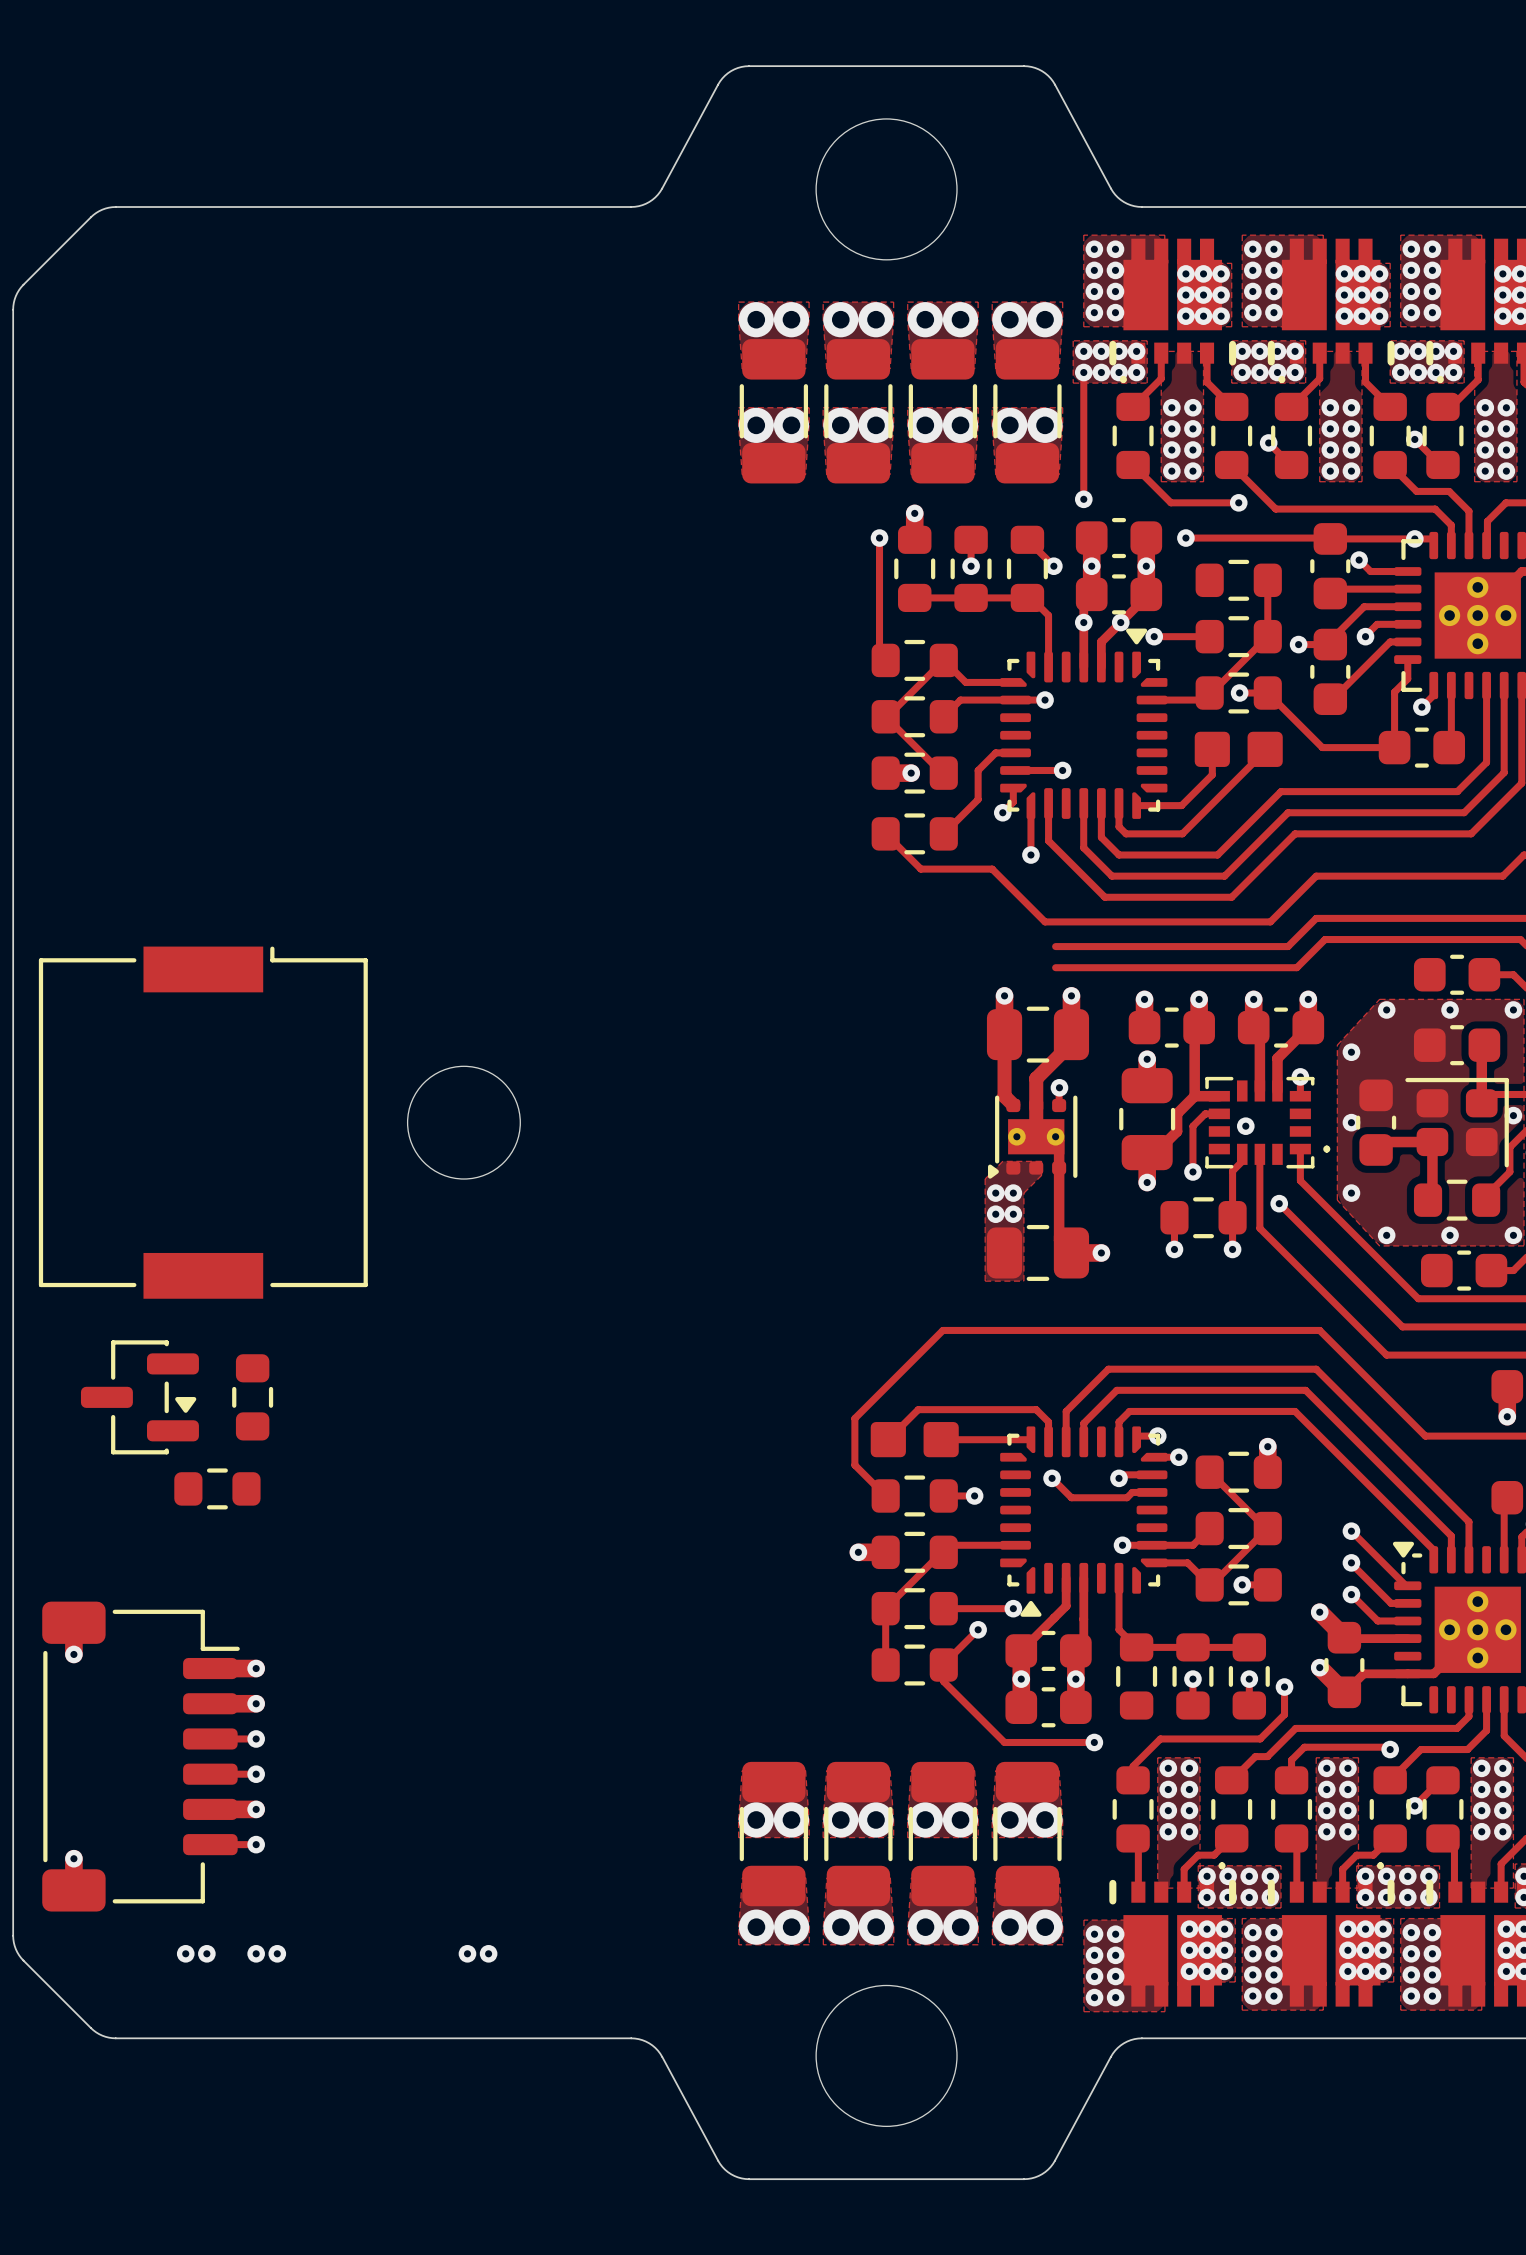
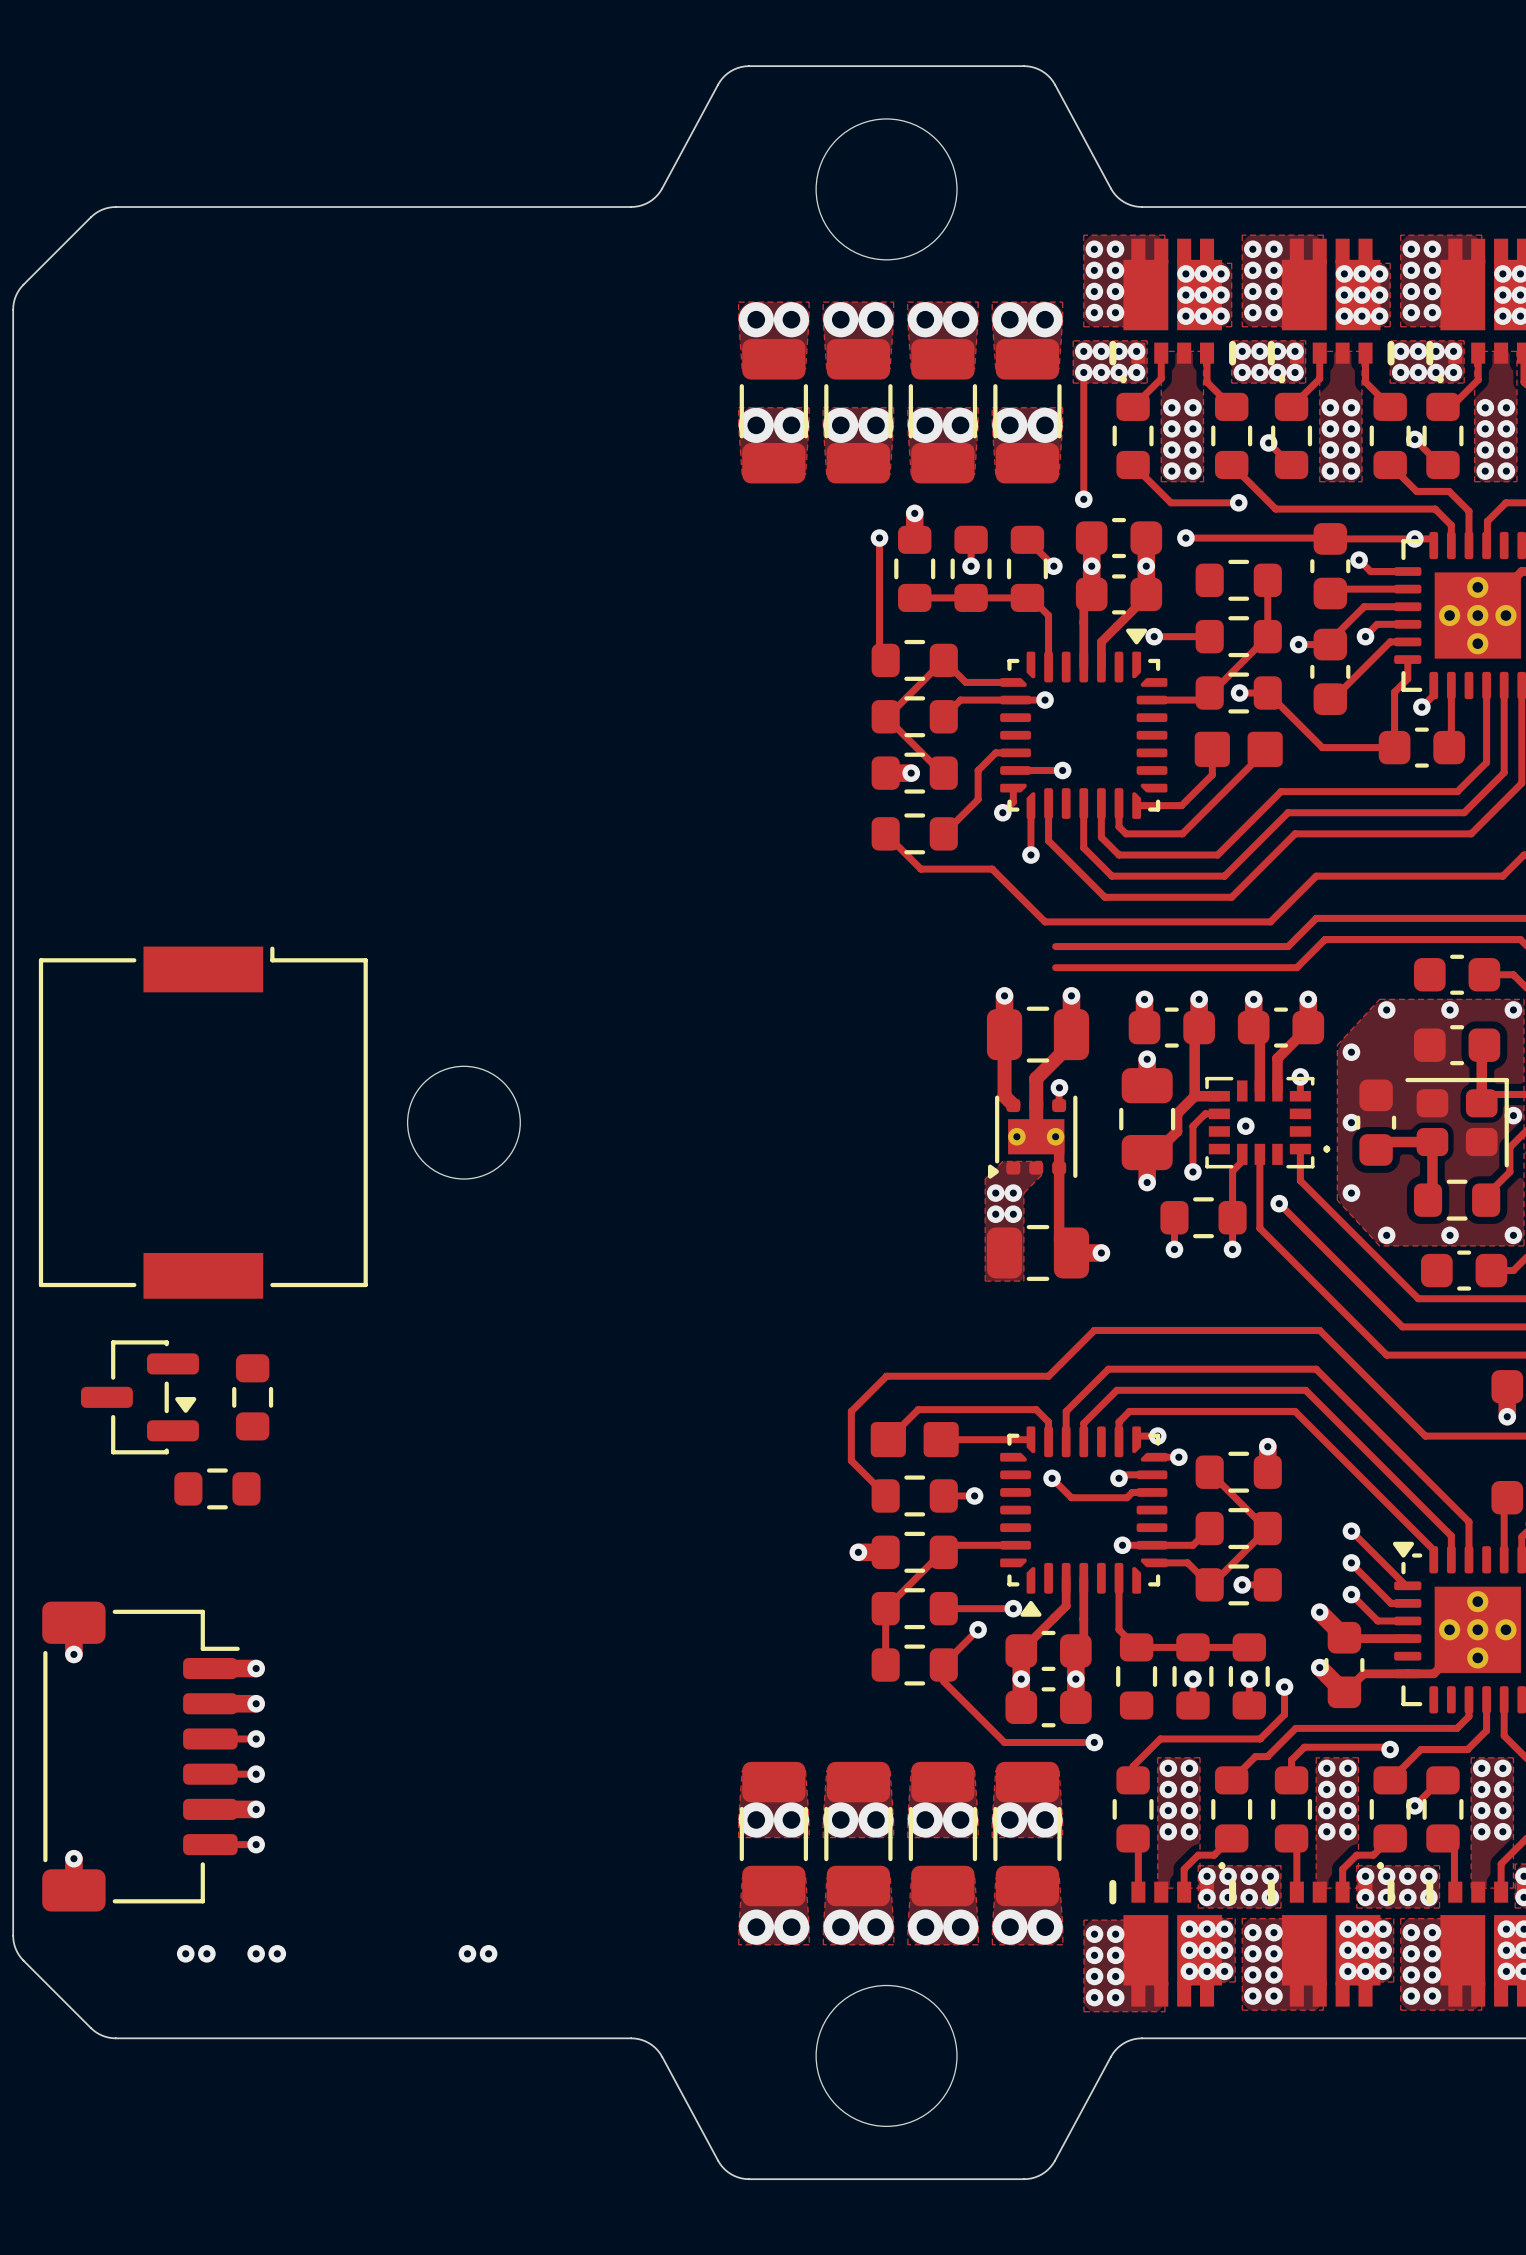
via: (1083, 622) -> none
via: (1120, 622) -> none
track: (1094, 1330) (942, 1330) (854, 1418) (854, 1465) (885, 1495) -> (1094, 1330) (1048, 1376) (886, 1376) (851, 1411) (851, 1460) (885, 1495)

